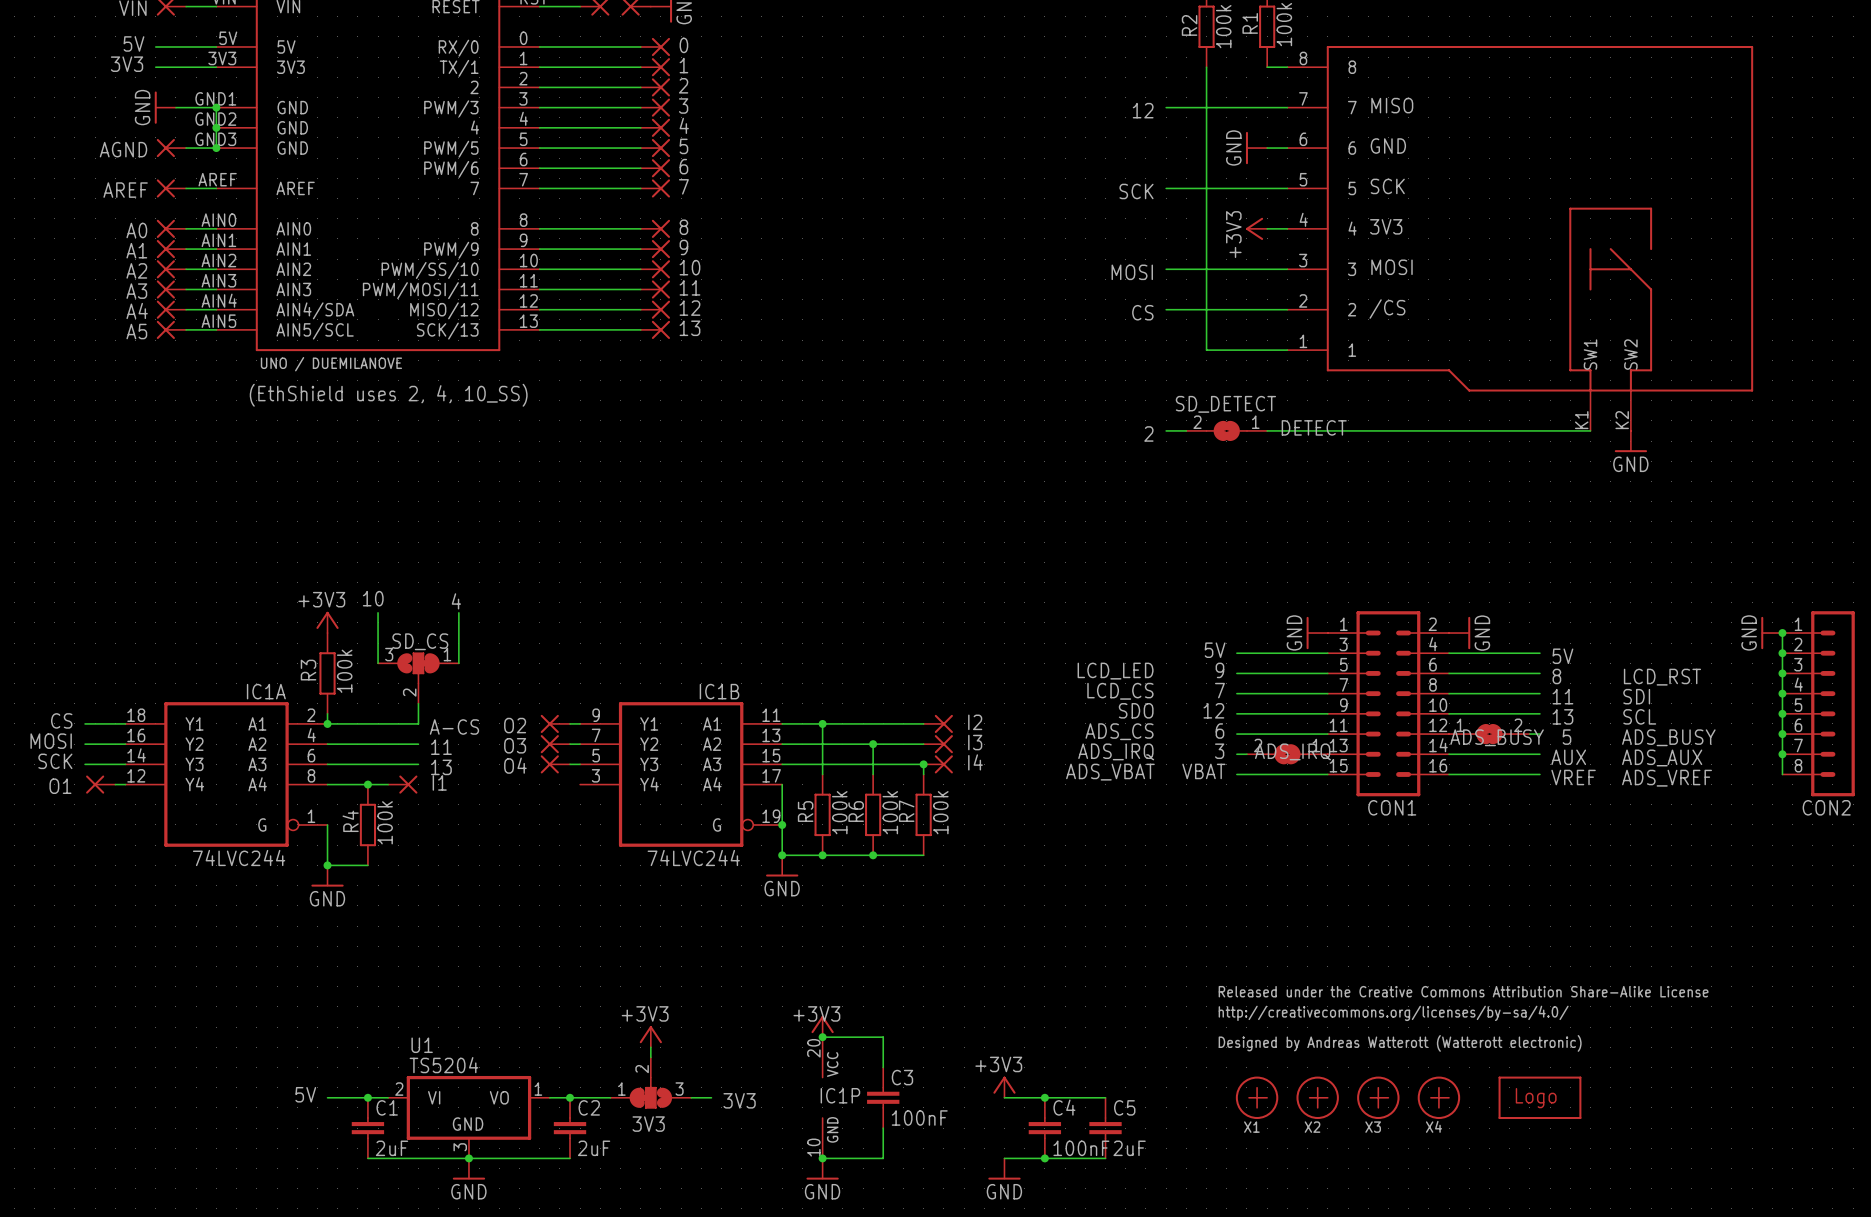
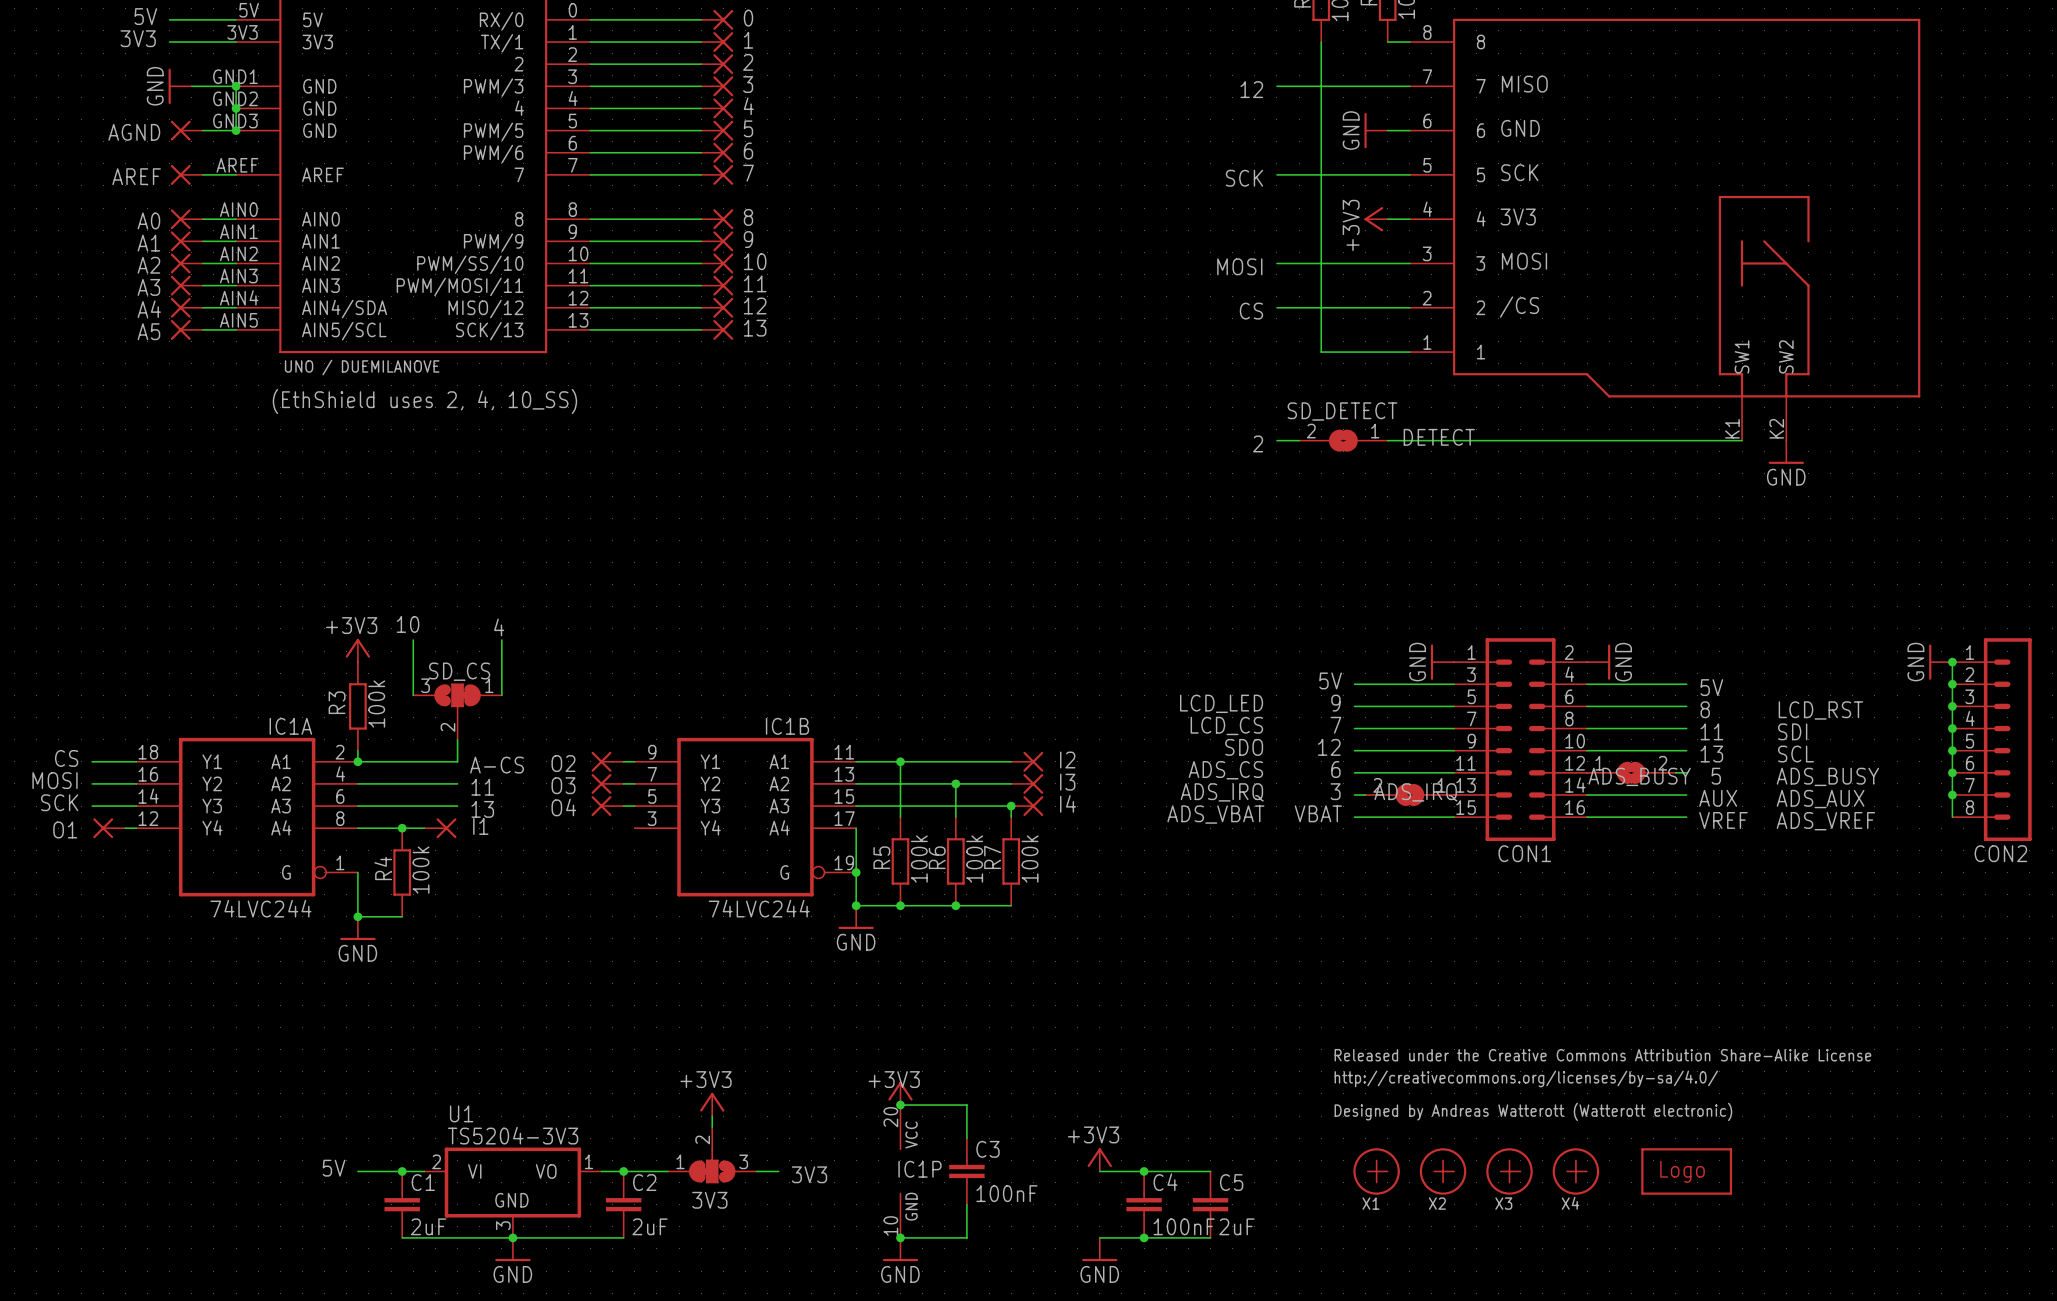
U1 value: TS5204 (443, 1065) -> TS5204-3V3 (513, 1135)

